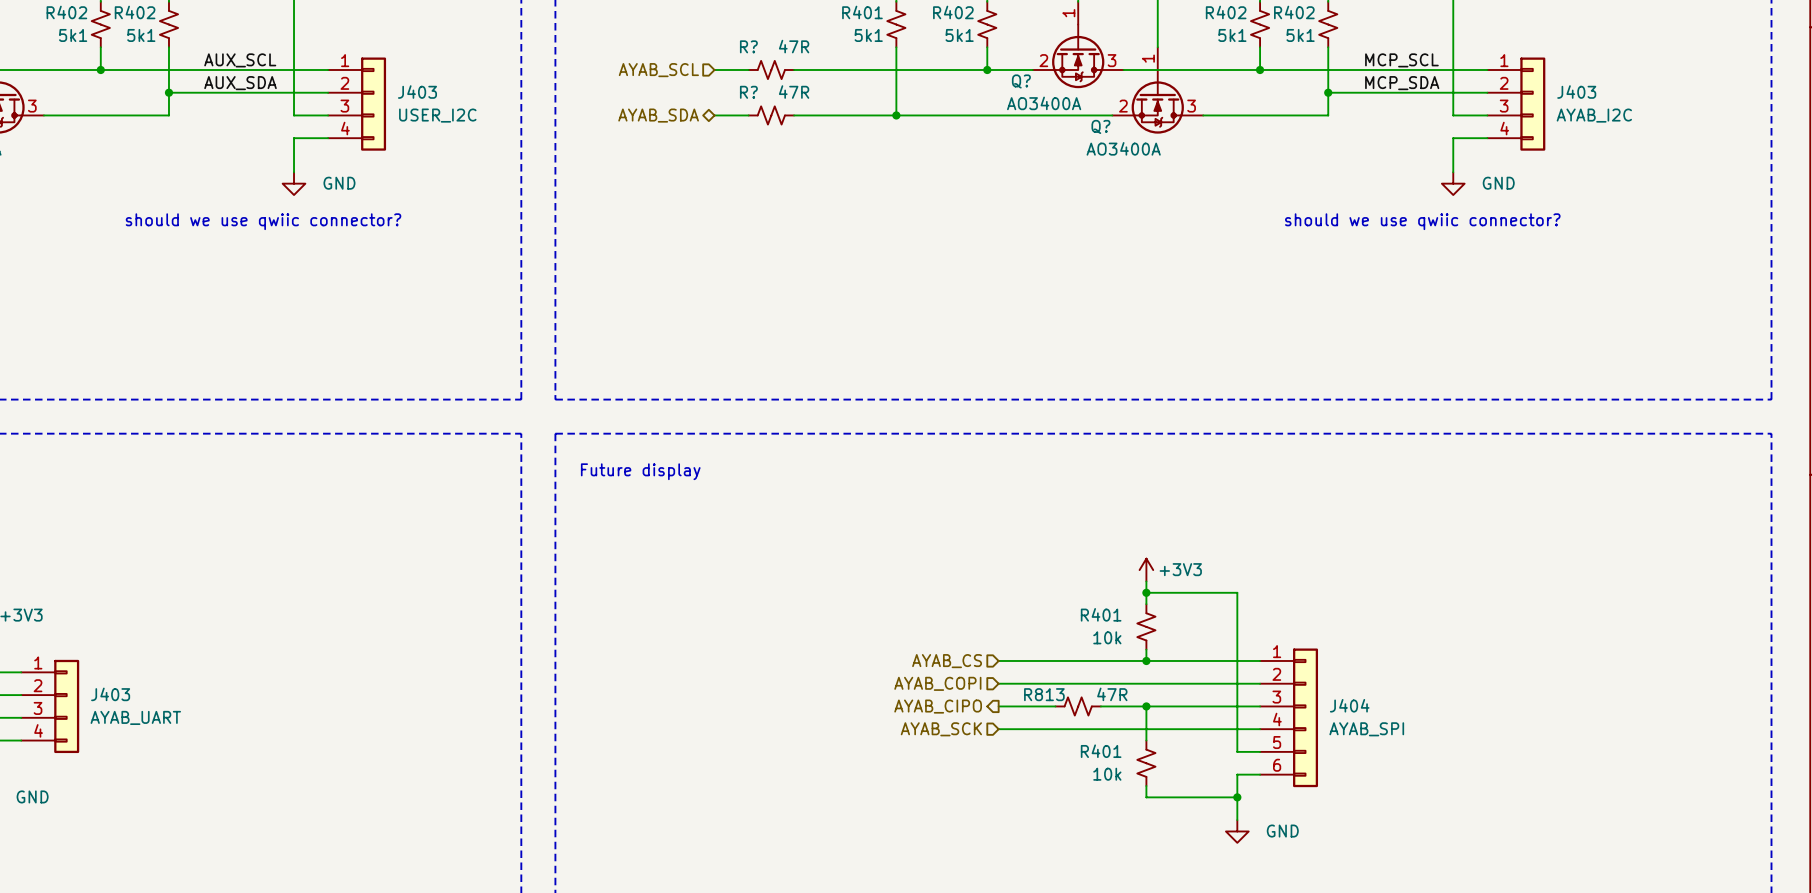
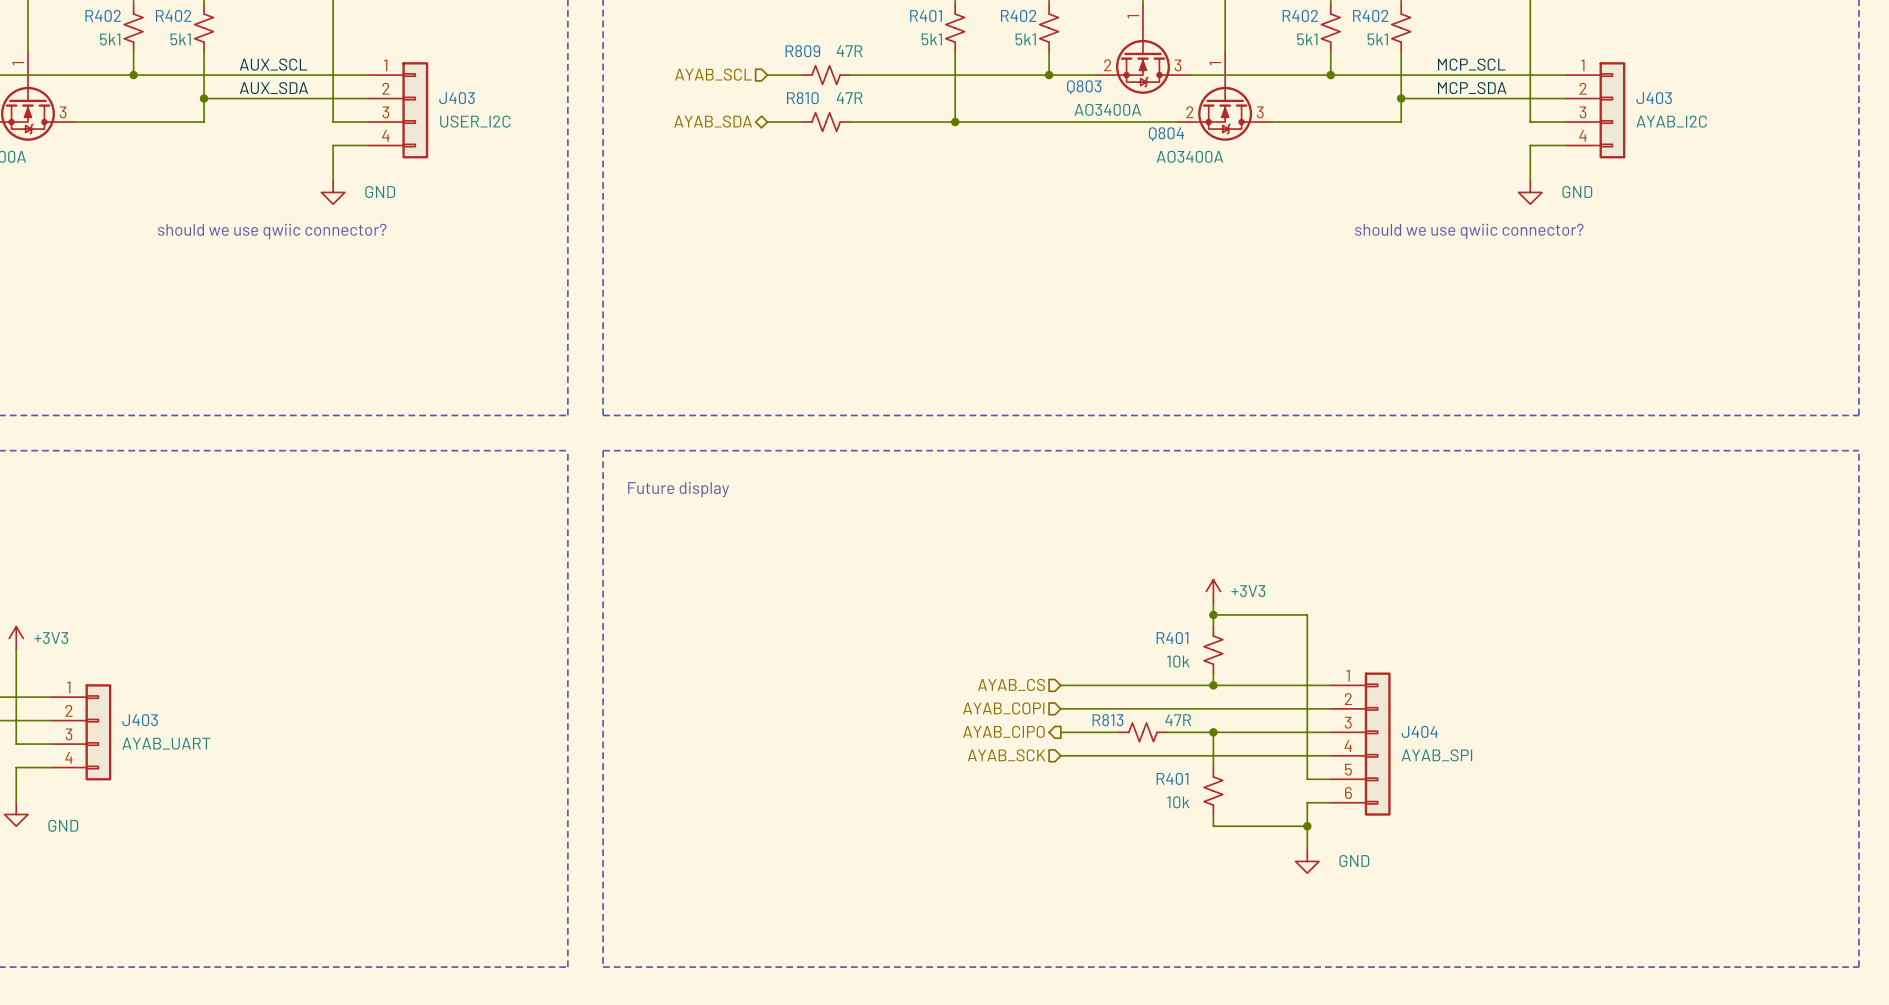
R? name: R? (748, 46) -> R809 (802, 51)
Q? name: Q? (1021, 81) -> Q803 (1084, 87)
R? name: R? (748, 92) -> R810 (802, 98)
Q? name: Q? (1100, 126) -> Q804 (1166, 134)

